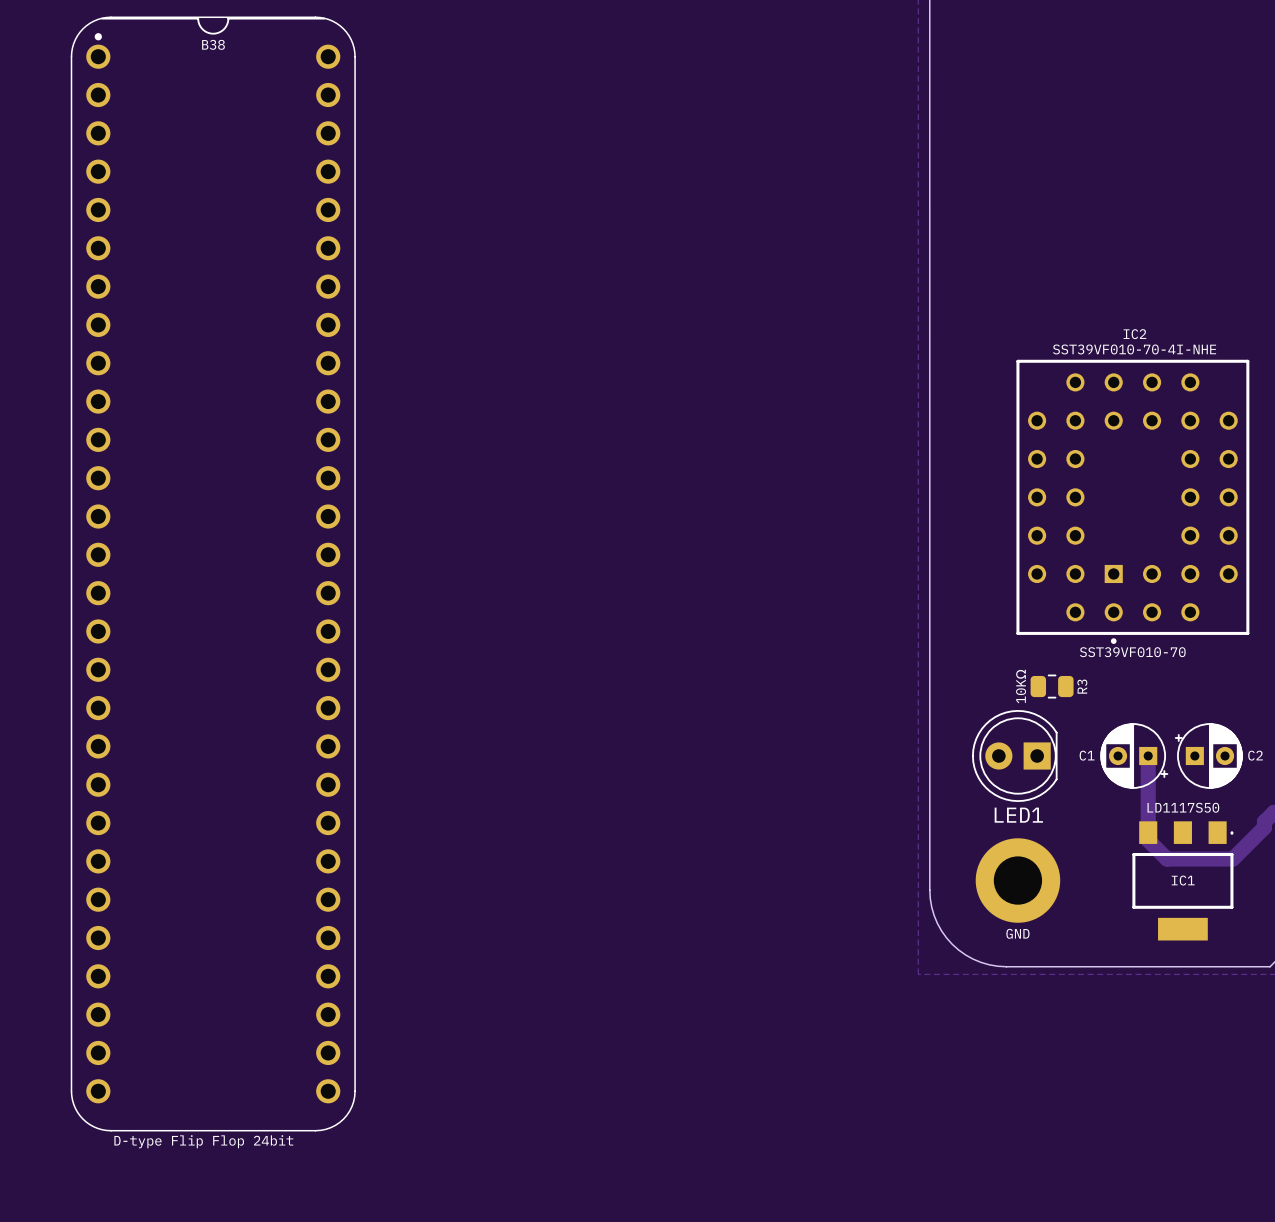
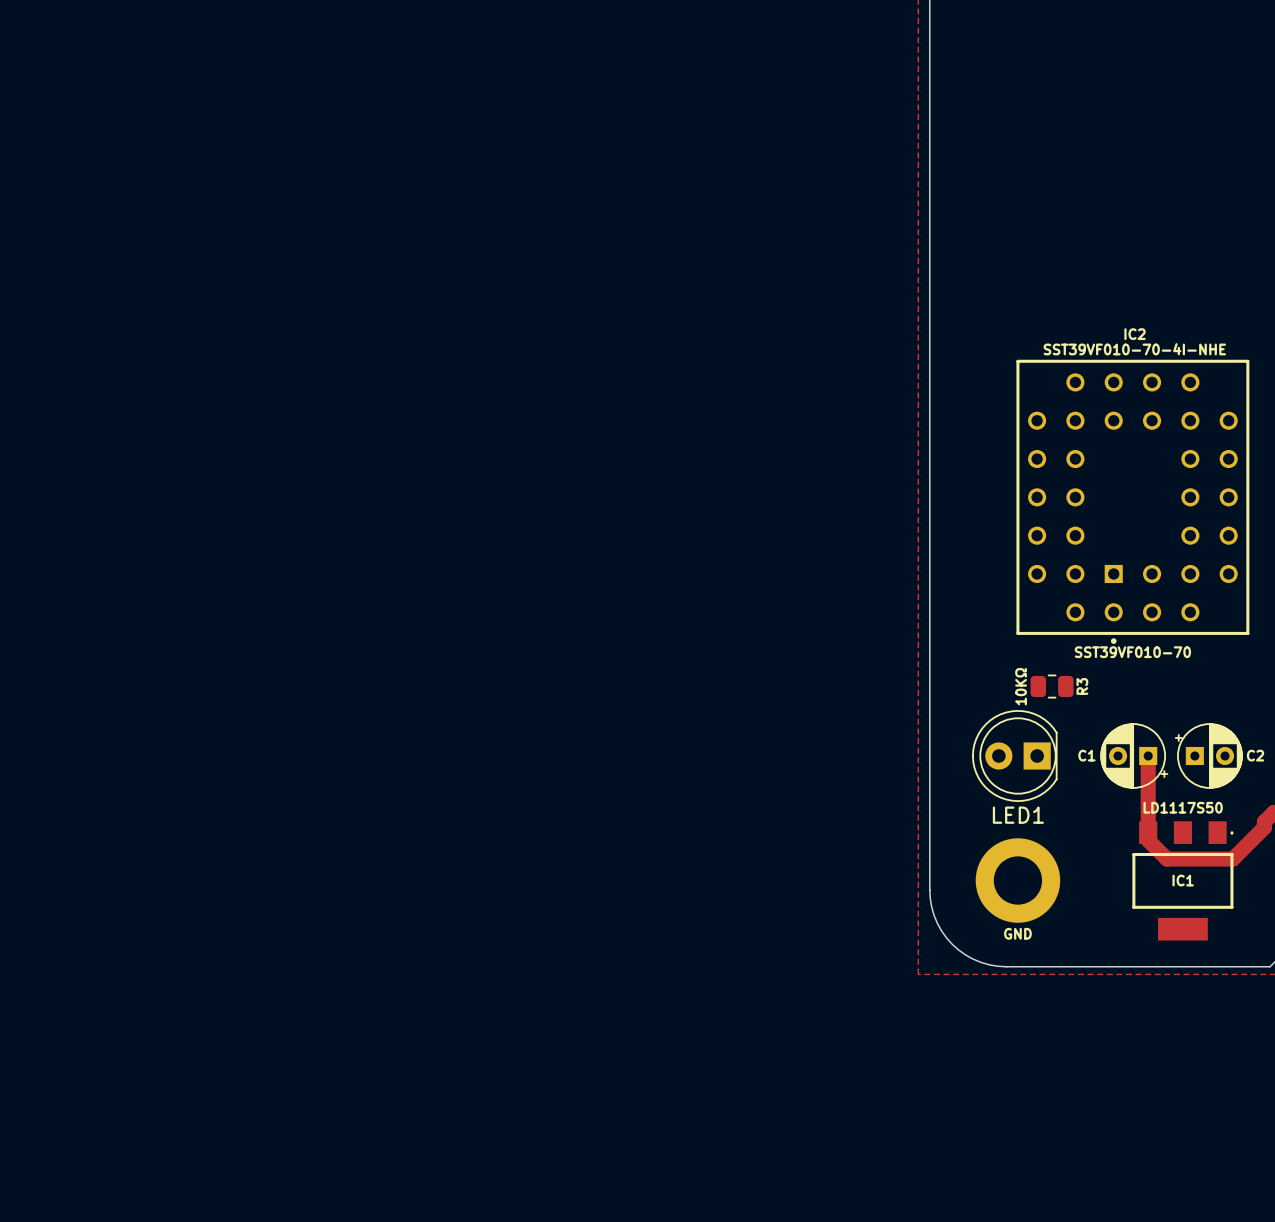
B38: (213, 573) -> none

